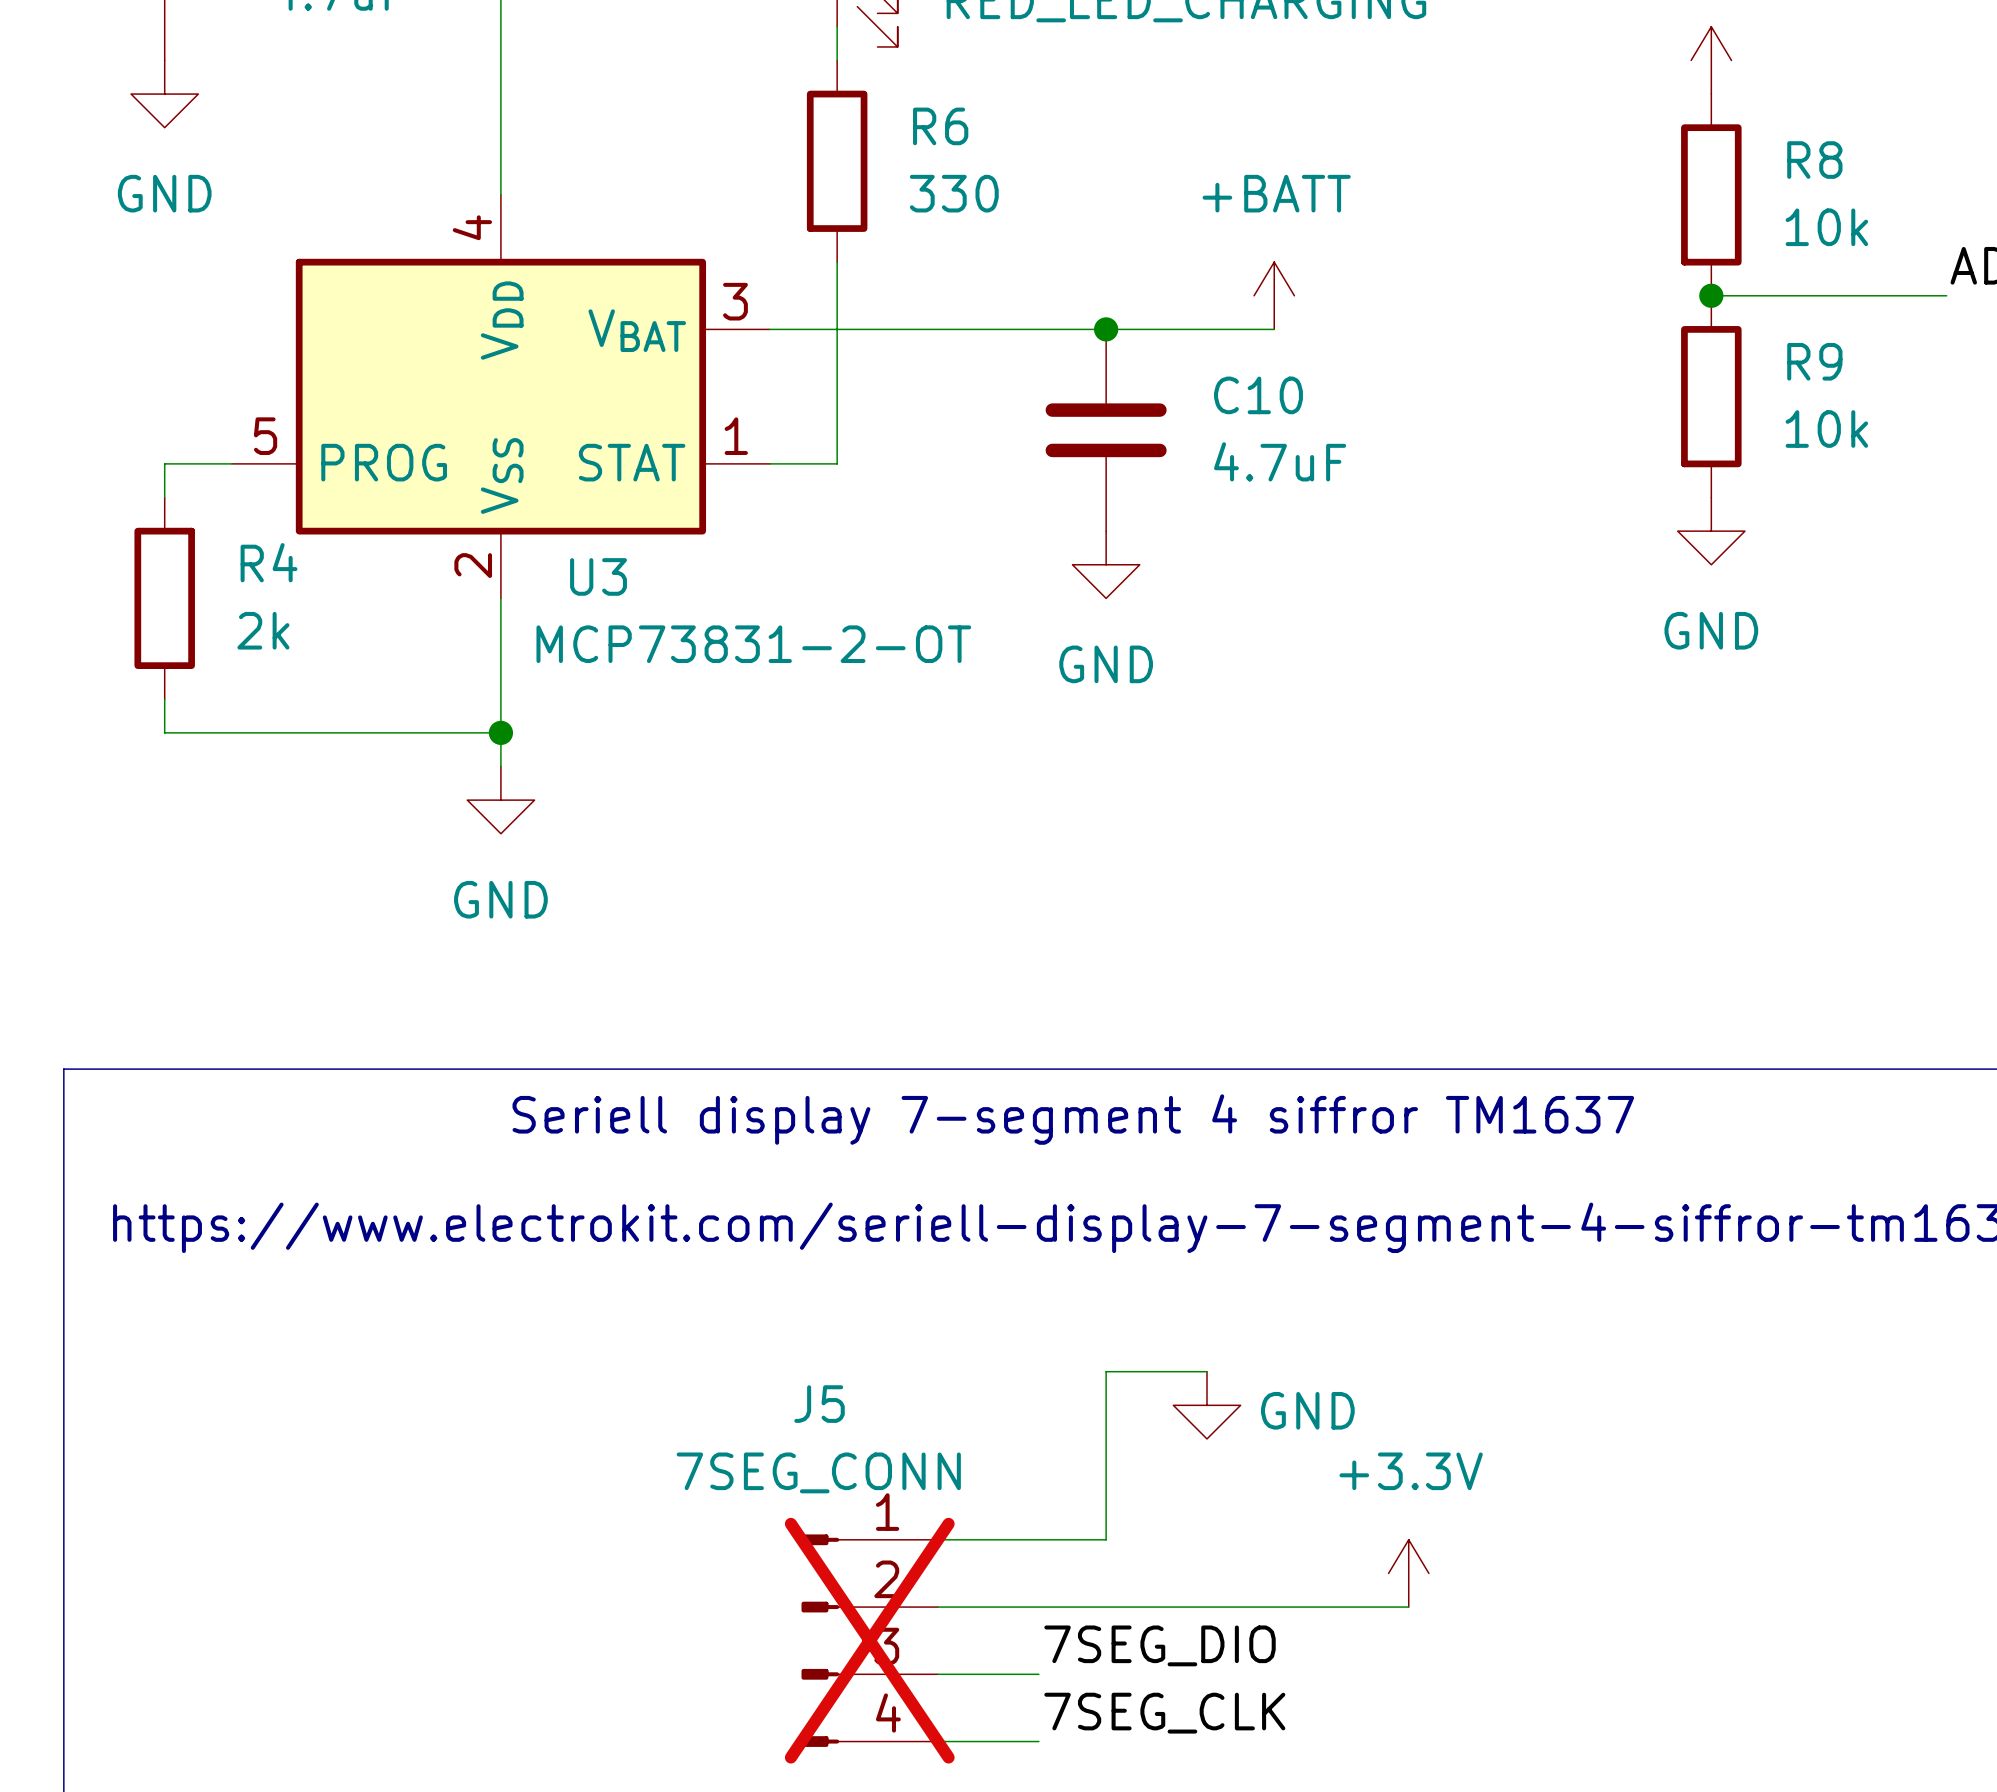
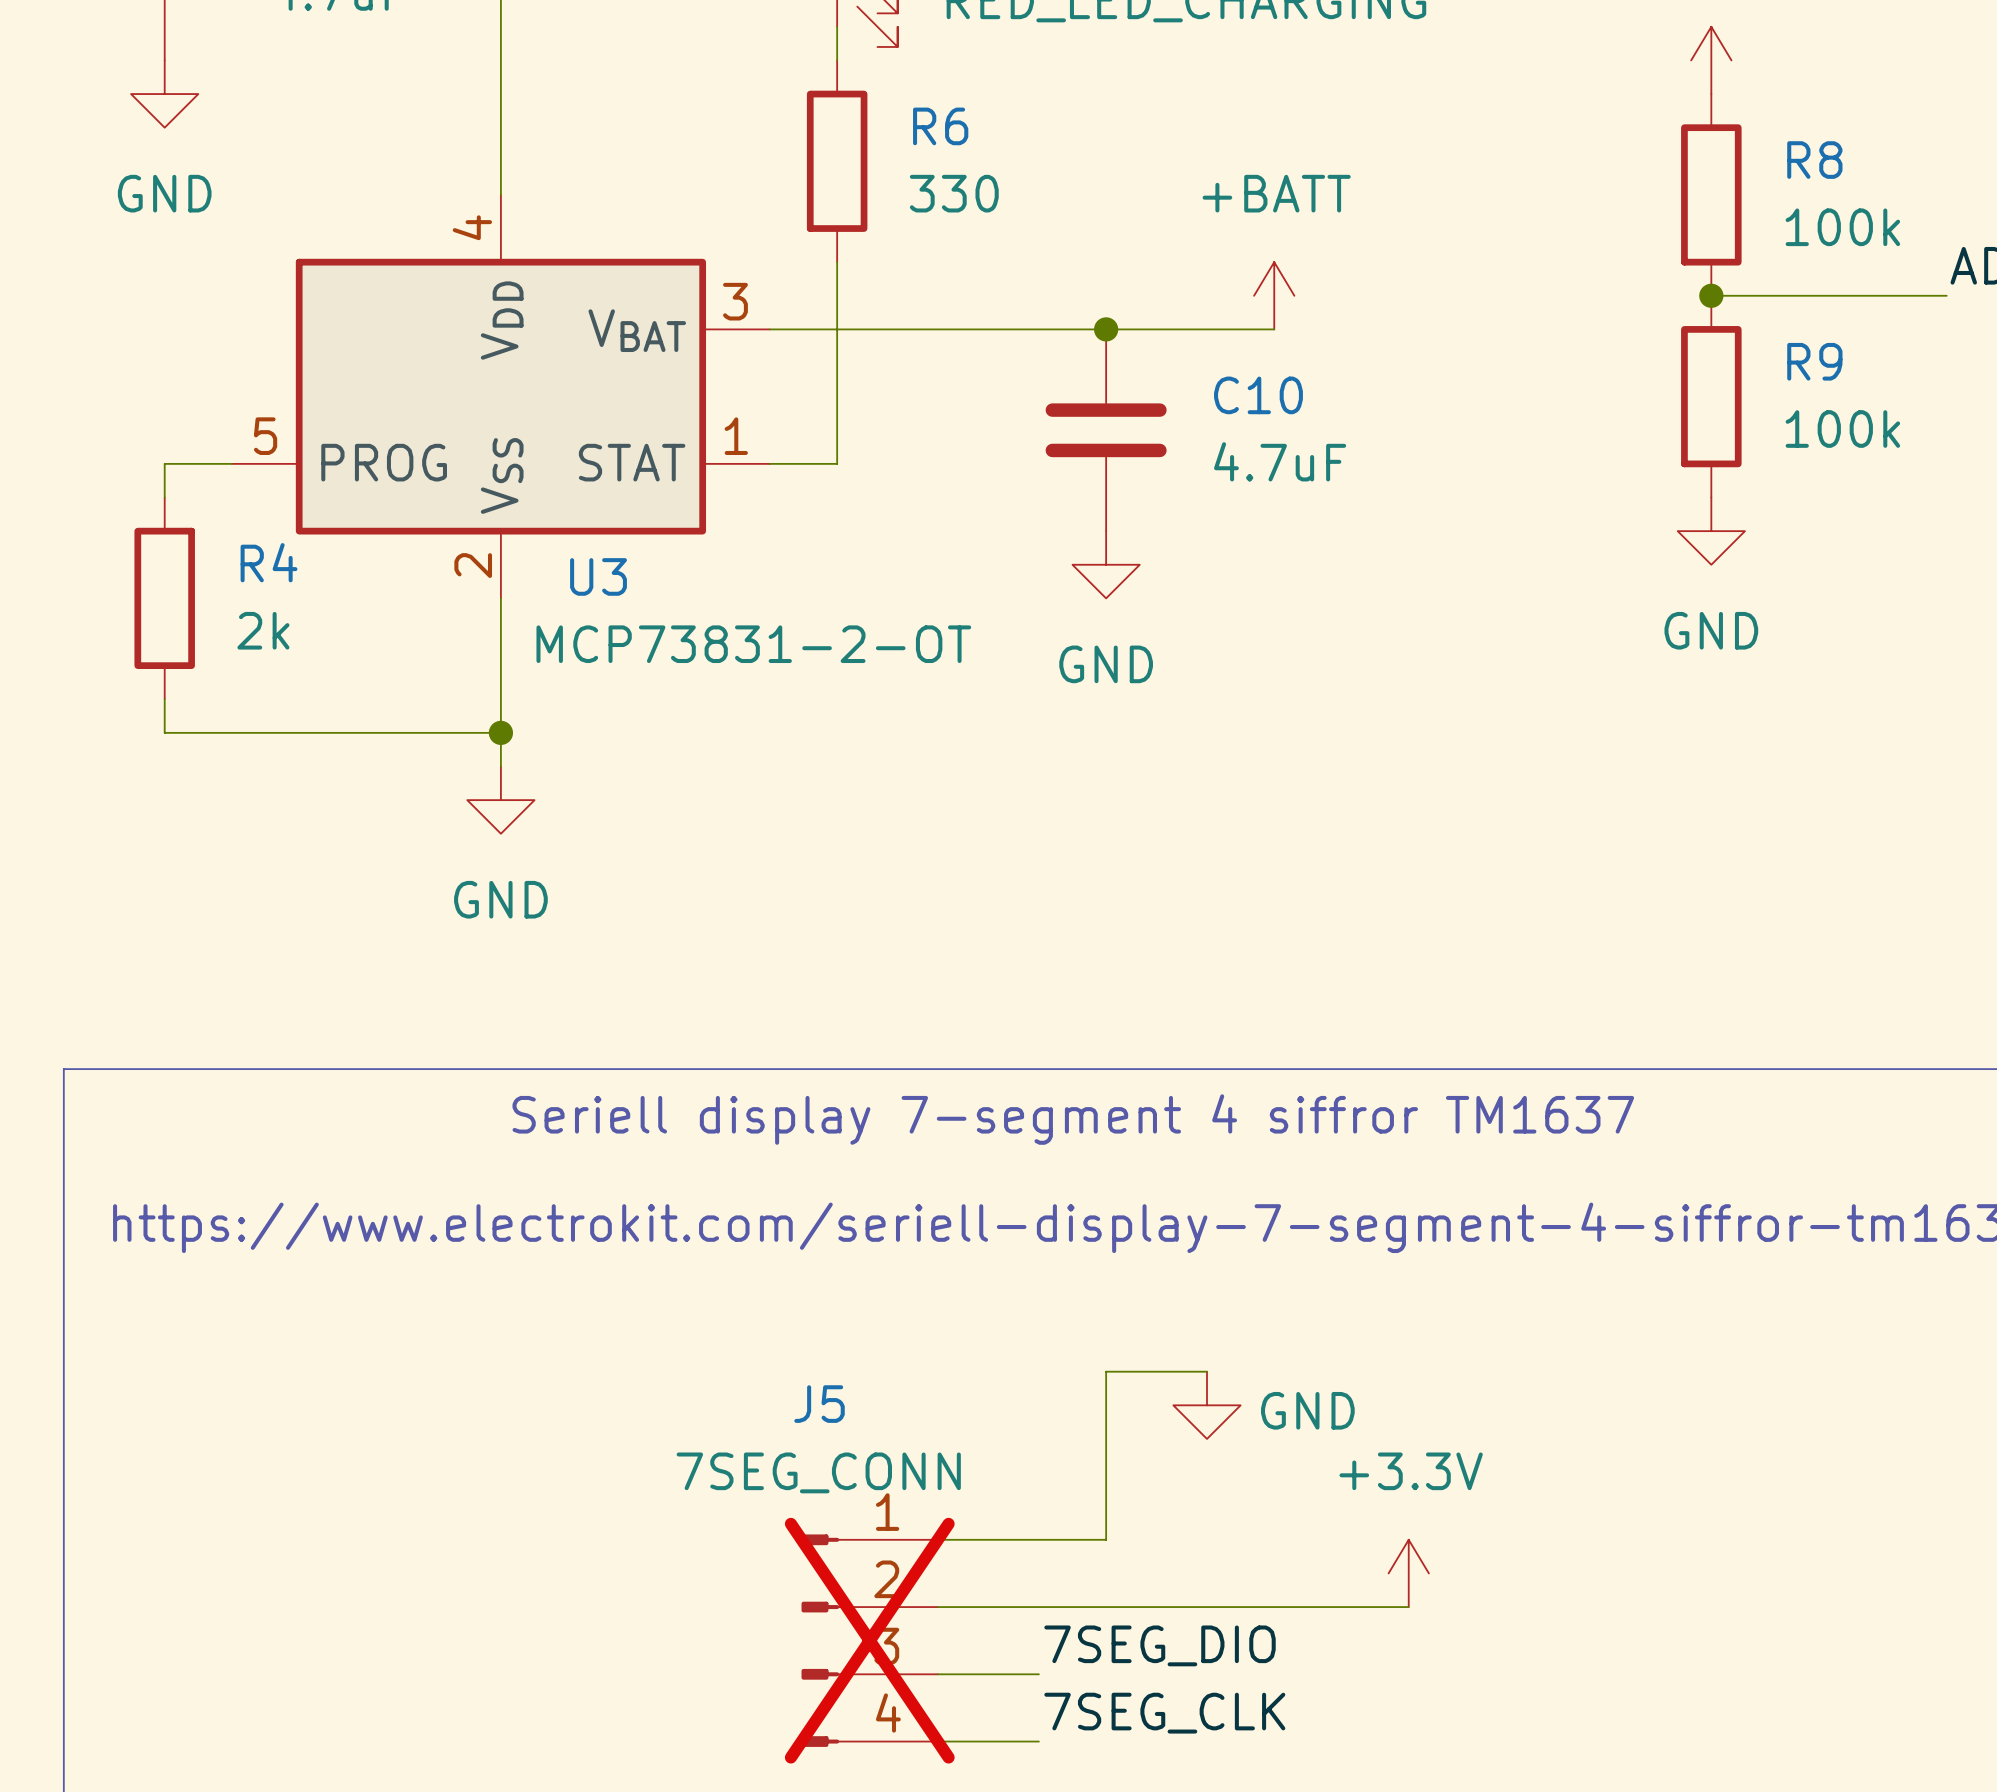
R8 value: 10k (1826, 227) -> 100k (1842, 227)
R9 value: 10k (1826, 429) -> 100k (1842, 429)

